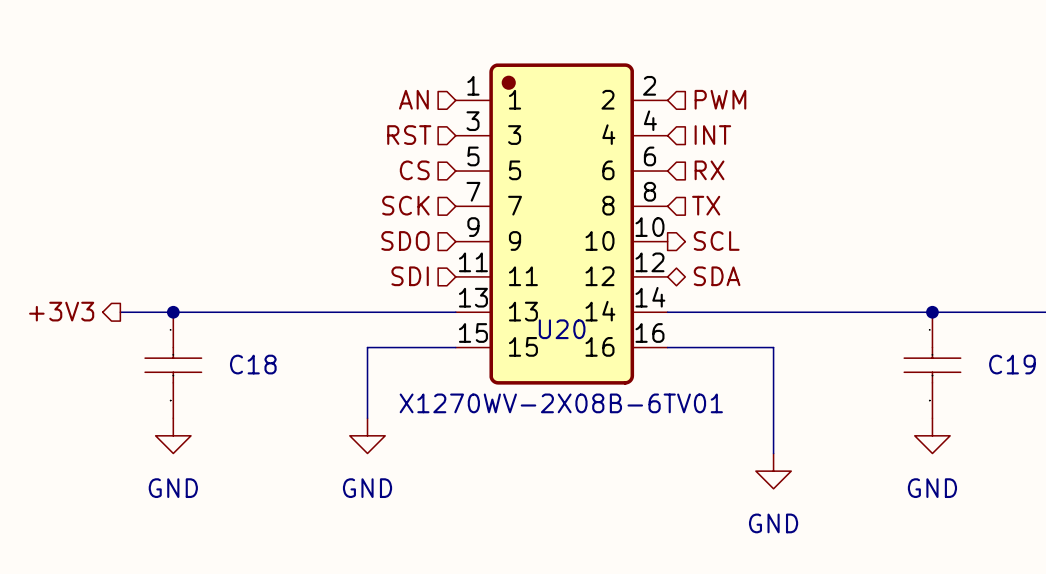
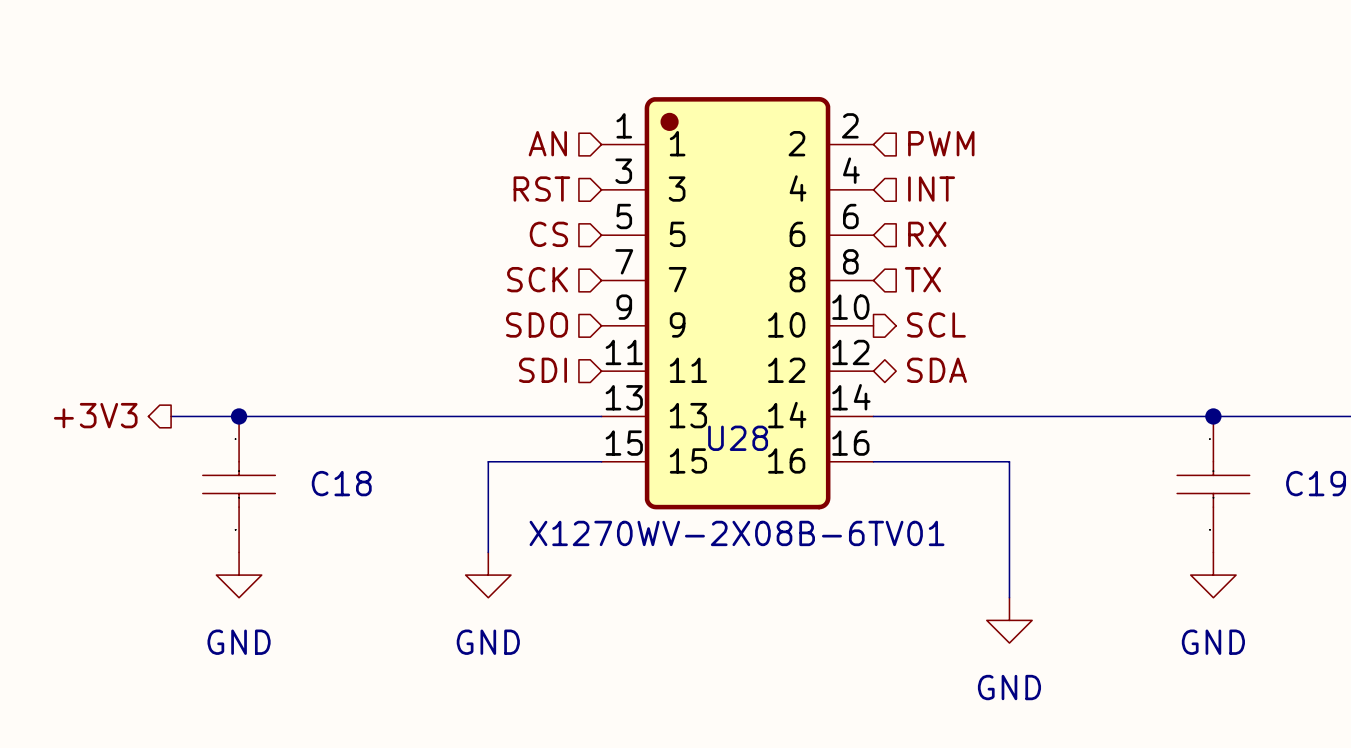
U20 name: U20 (562, 329) -> U28 (738, 438)

